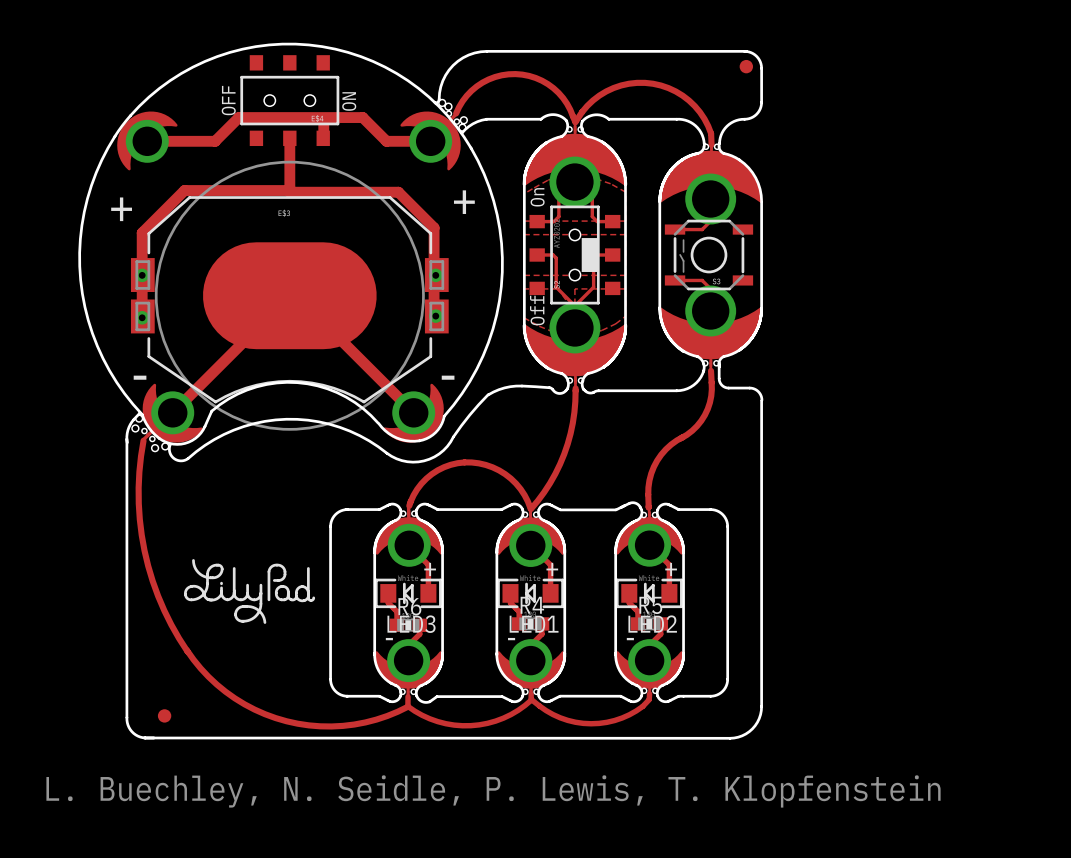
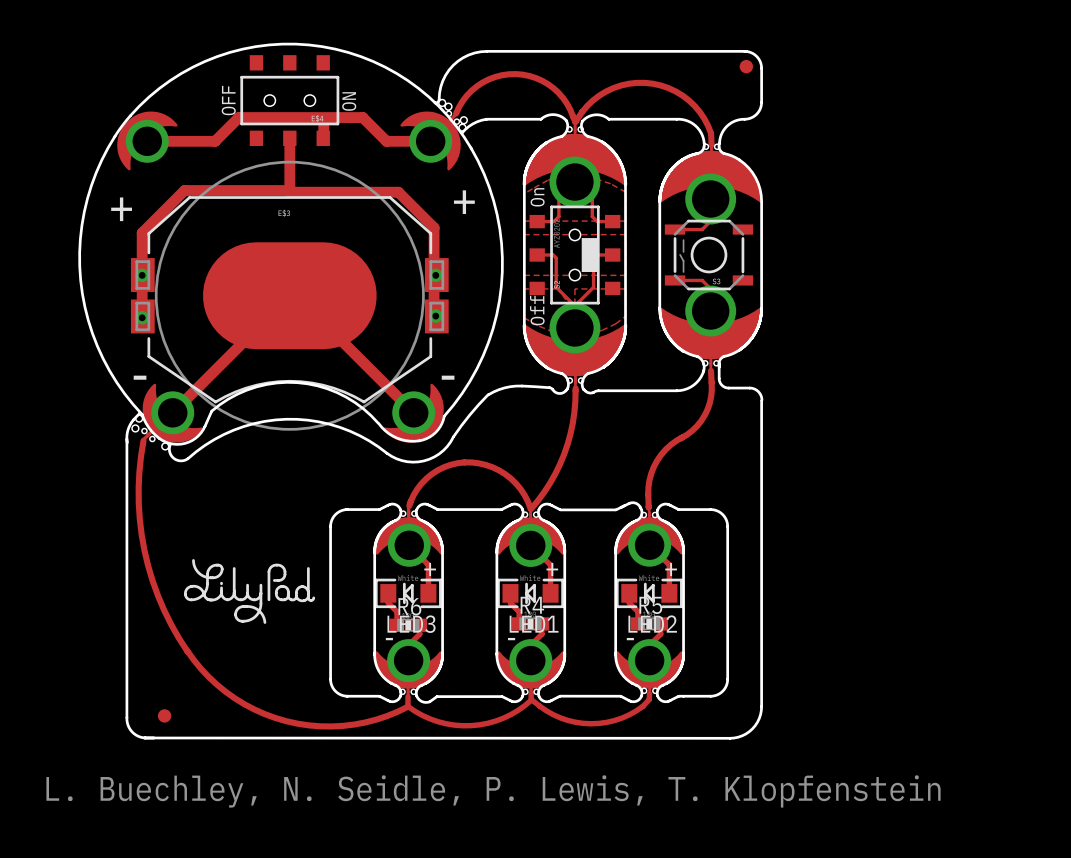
hole: (155, 448) -> none

